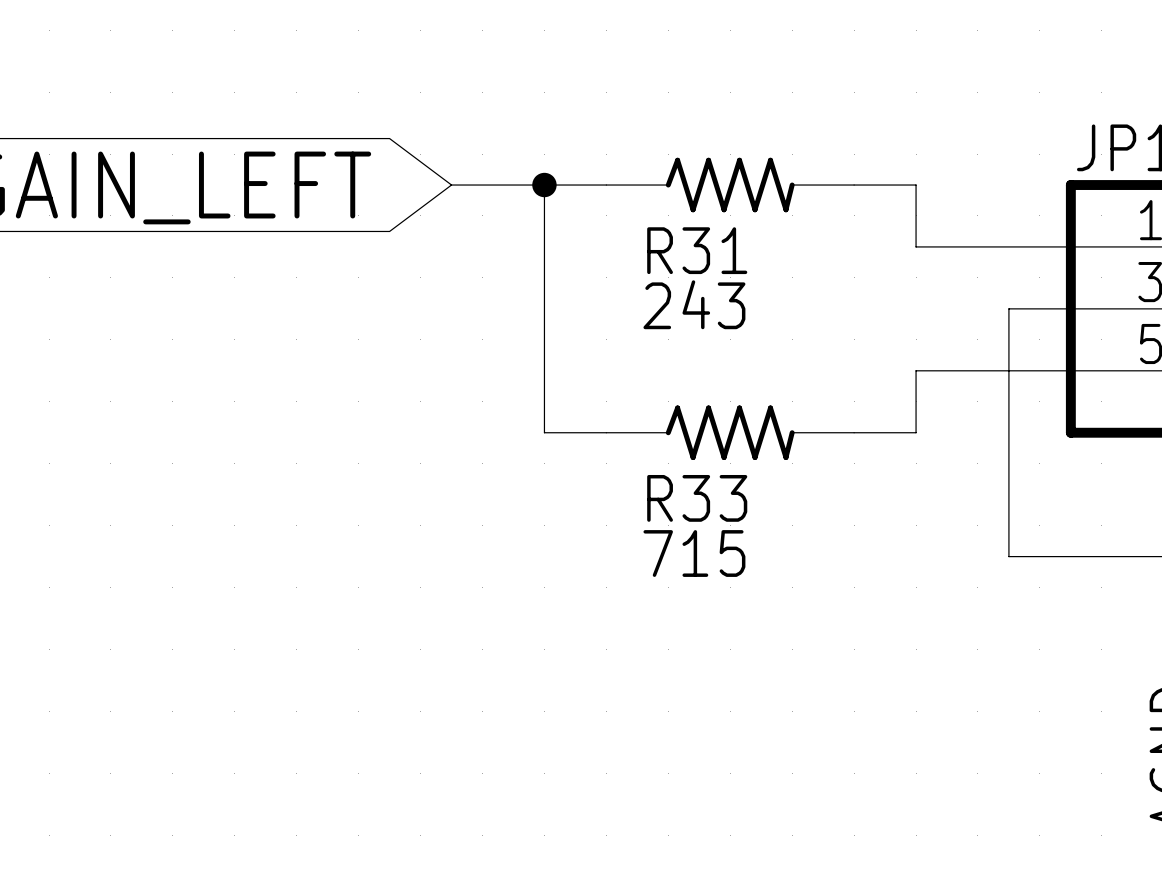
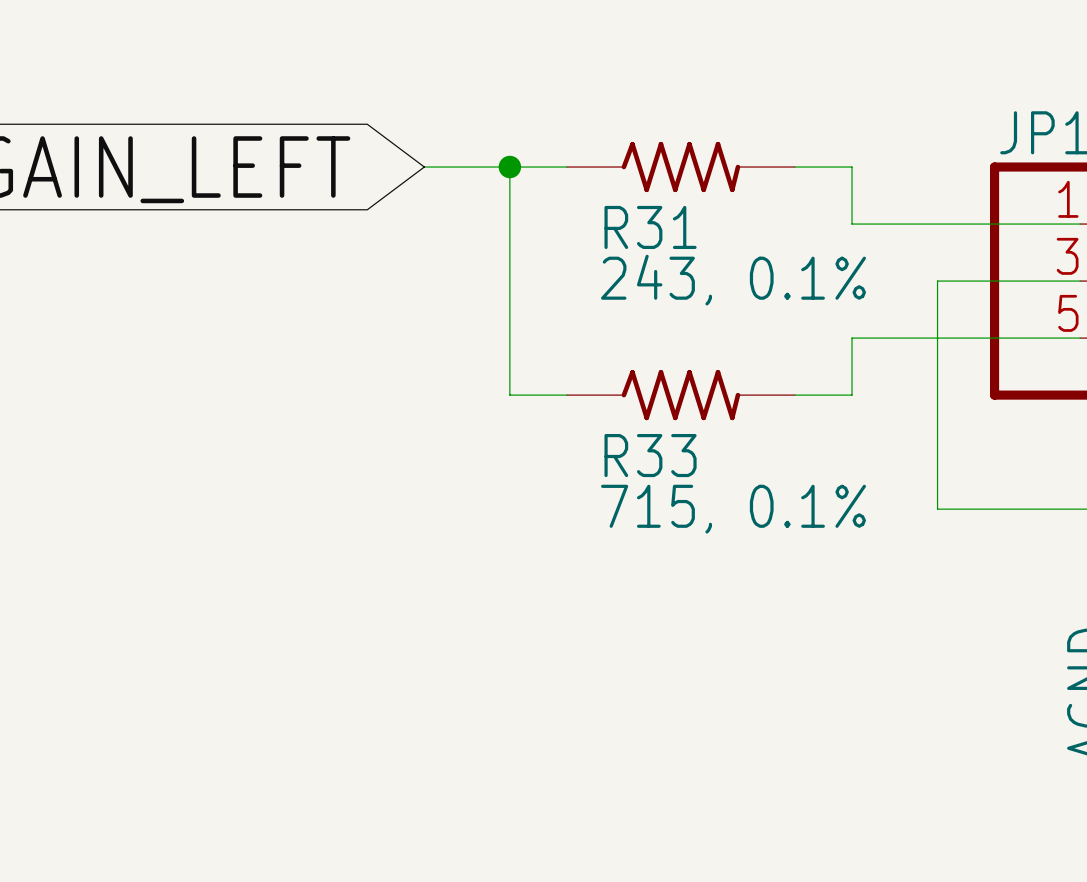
R31 value: 243 (694, 304) -> 243, 0.1% (733, 280)
R33 value: 715 (694, 553) -> 715, 0.1% (733, 509)

